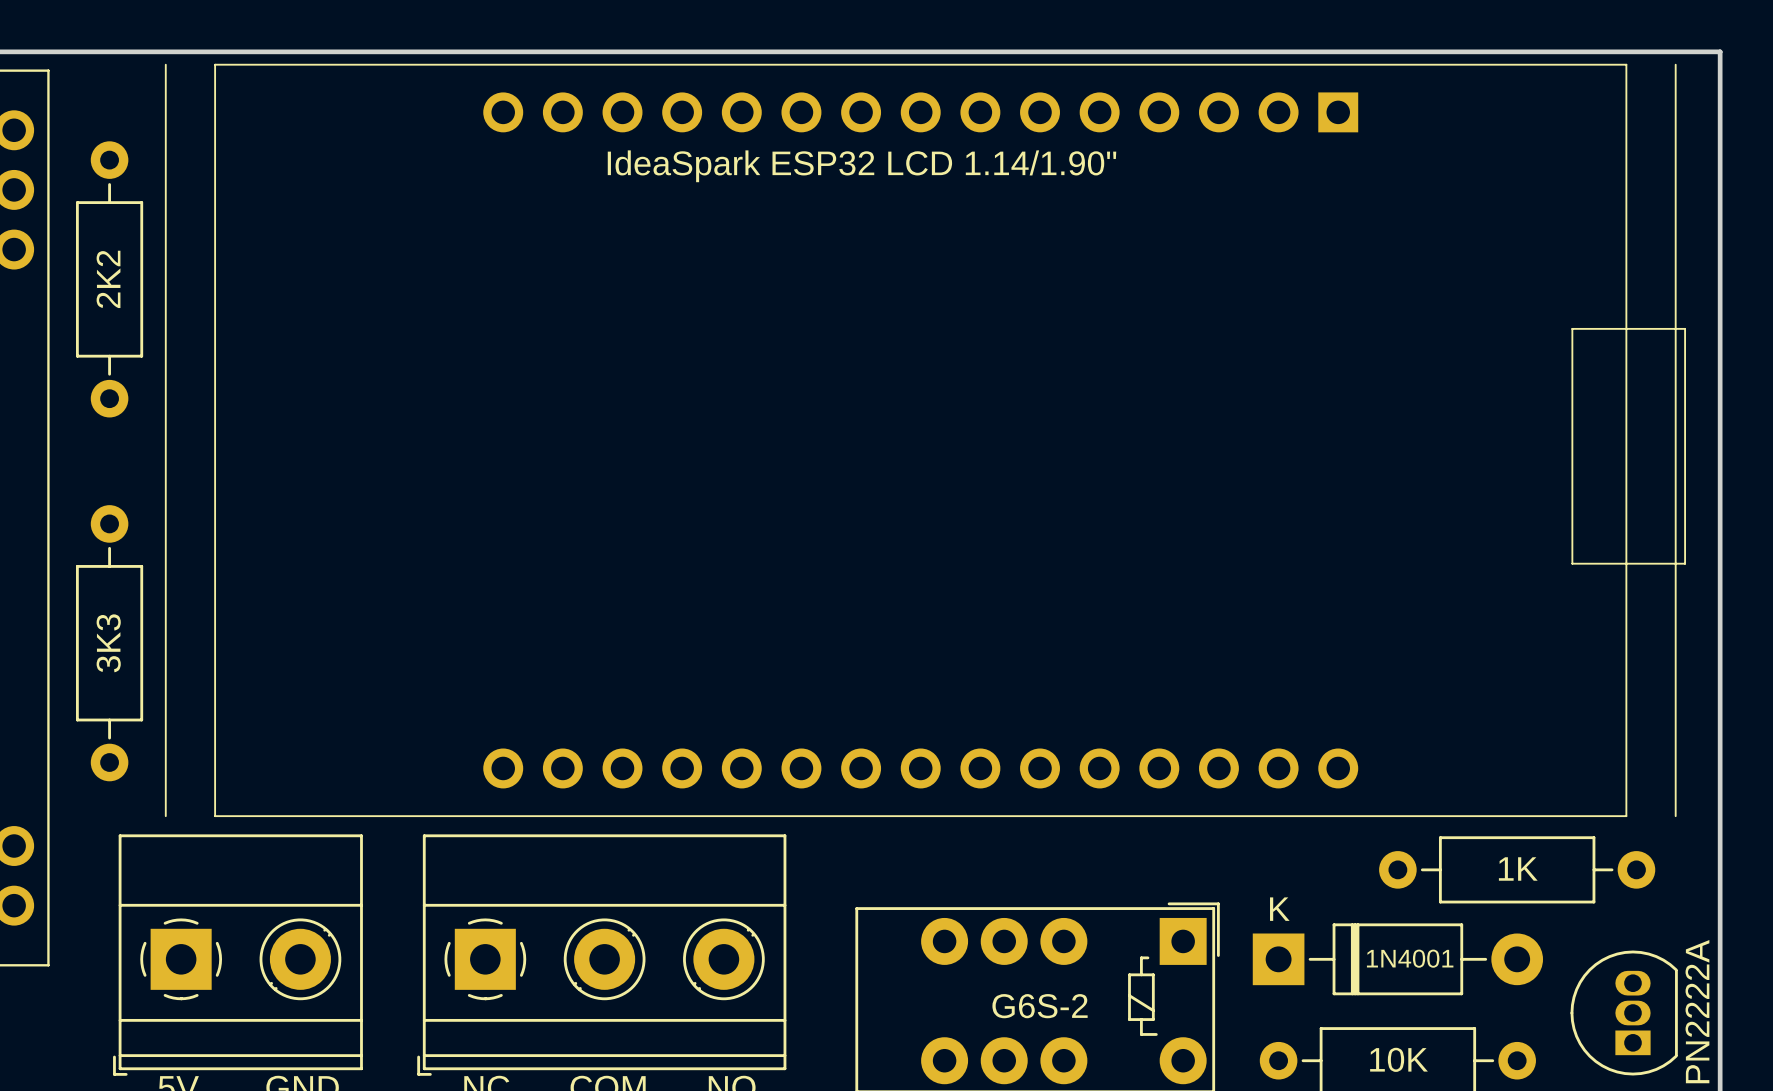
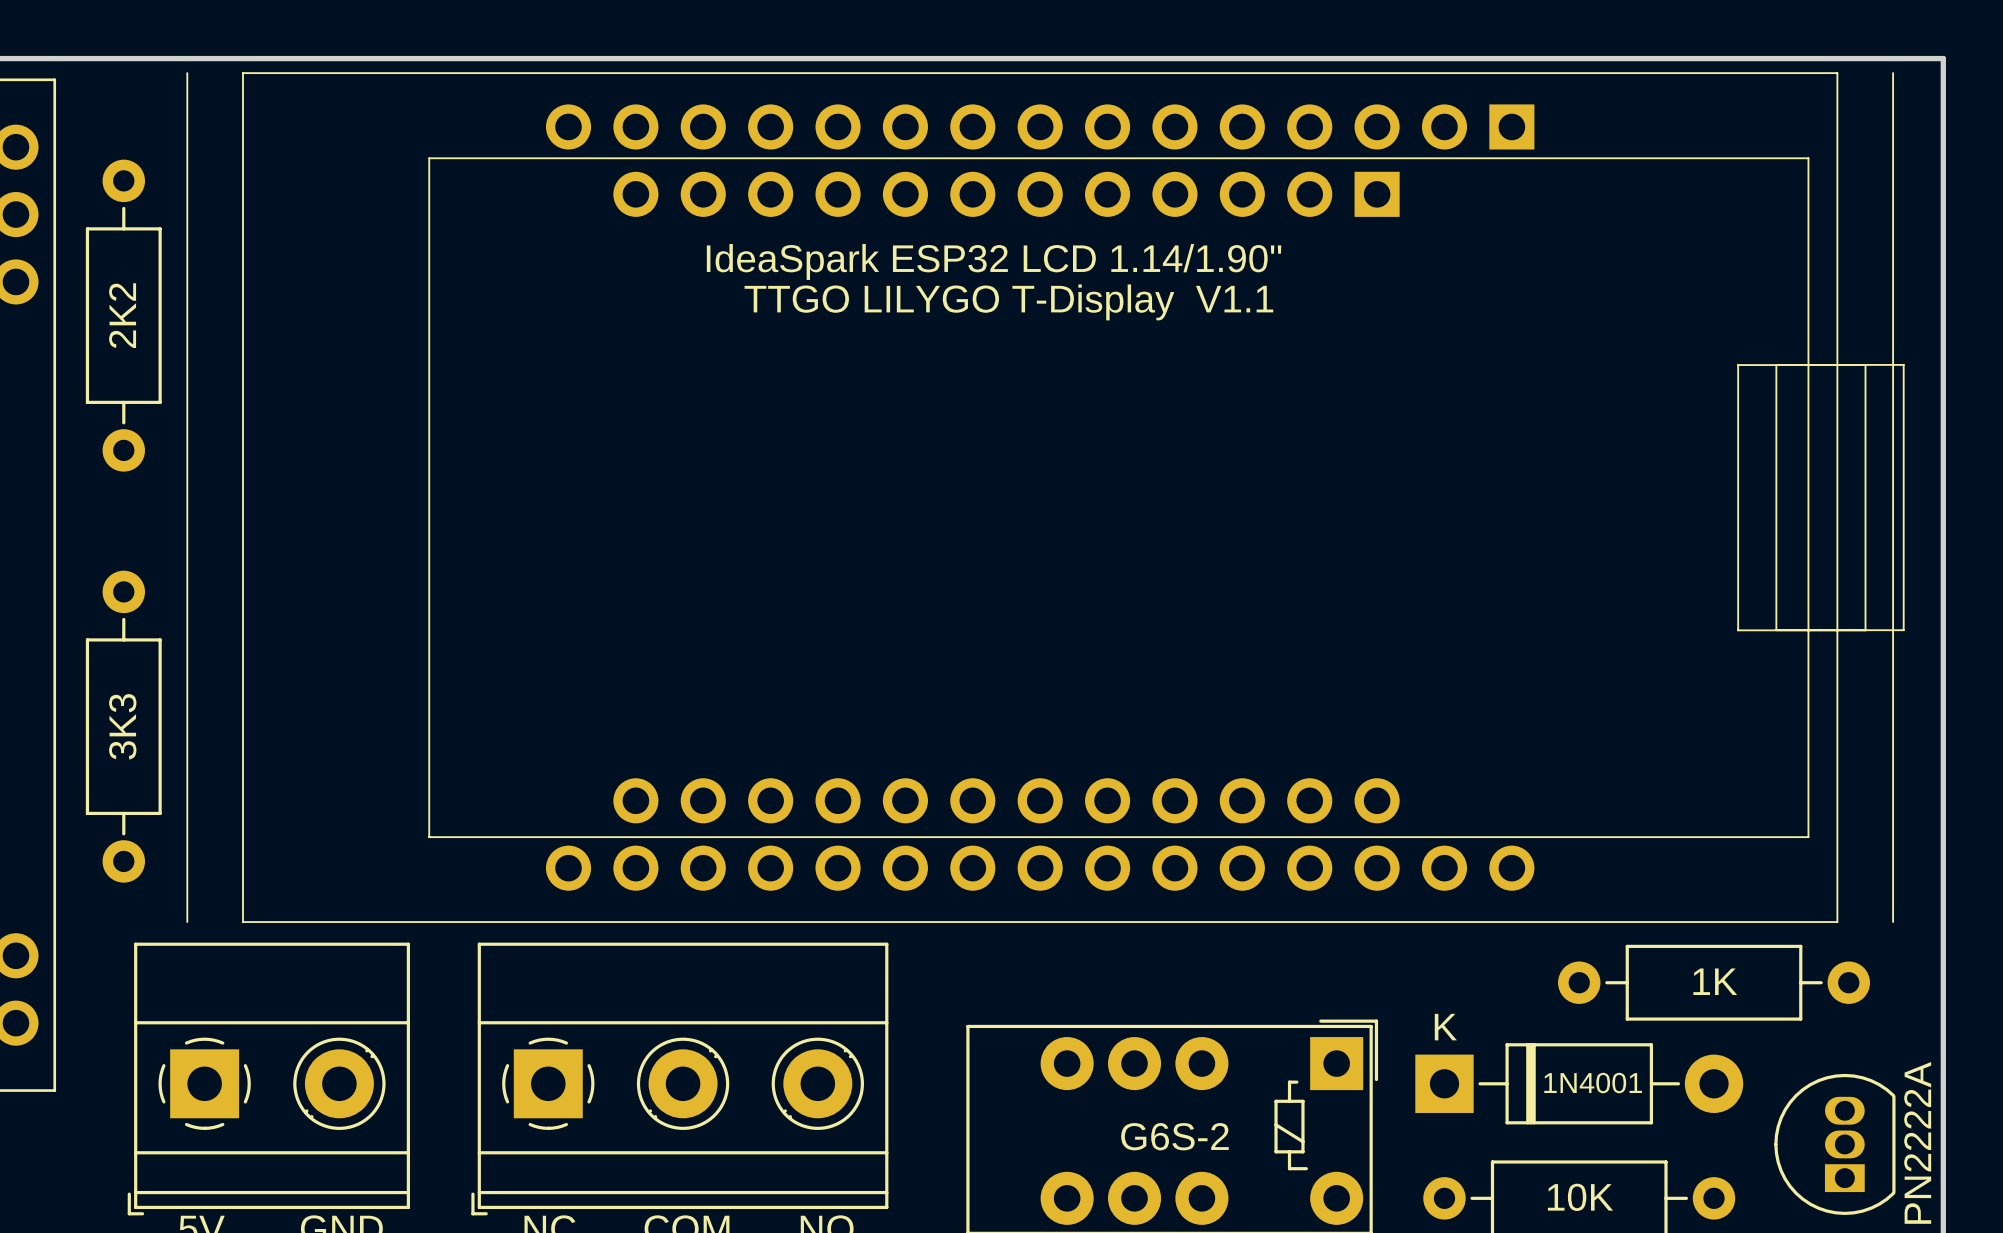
part footprint: [165, 64, 1686, 817] -> [186, 72, 1905, 923]
text position: IdeaSpark ESP32 LCD 1.14/1.90" (861, 166) -> IdeaSpark ESP32 LCD 1.14/1.90" (994, 261)
text: none -> TTGO LILYGO T-Display V1.1 (1008, 302)
part: none -> (1147, 497)

